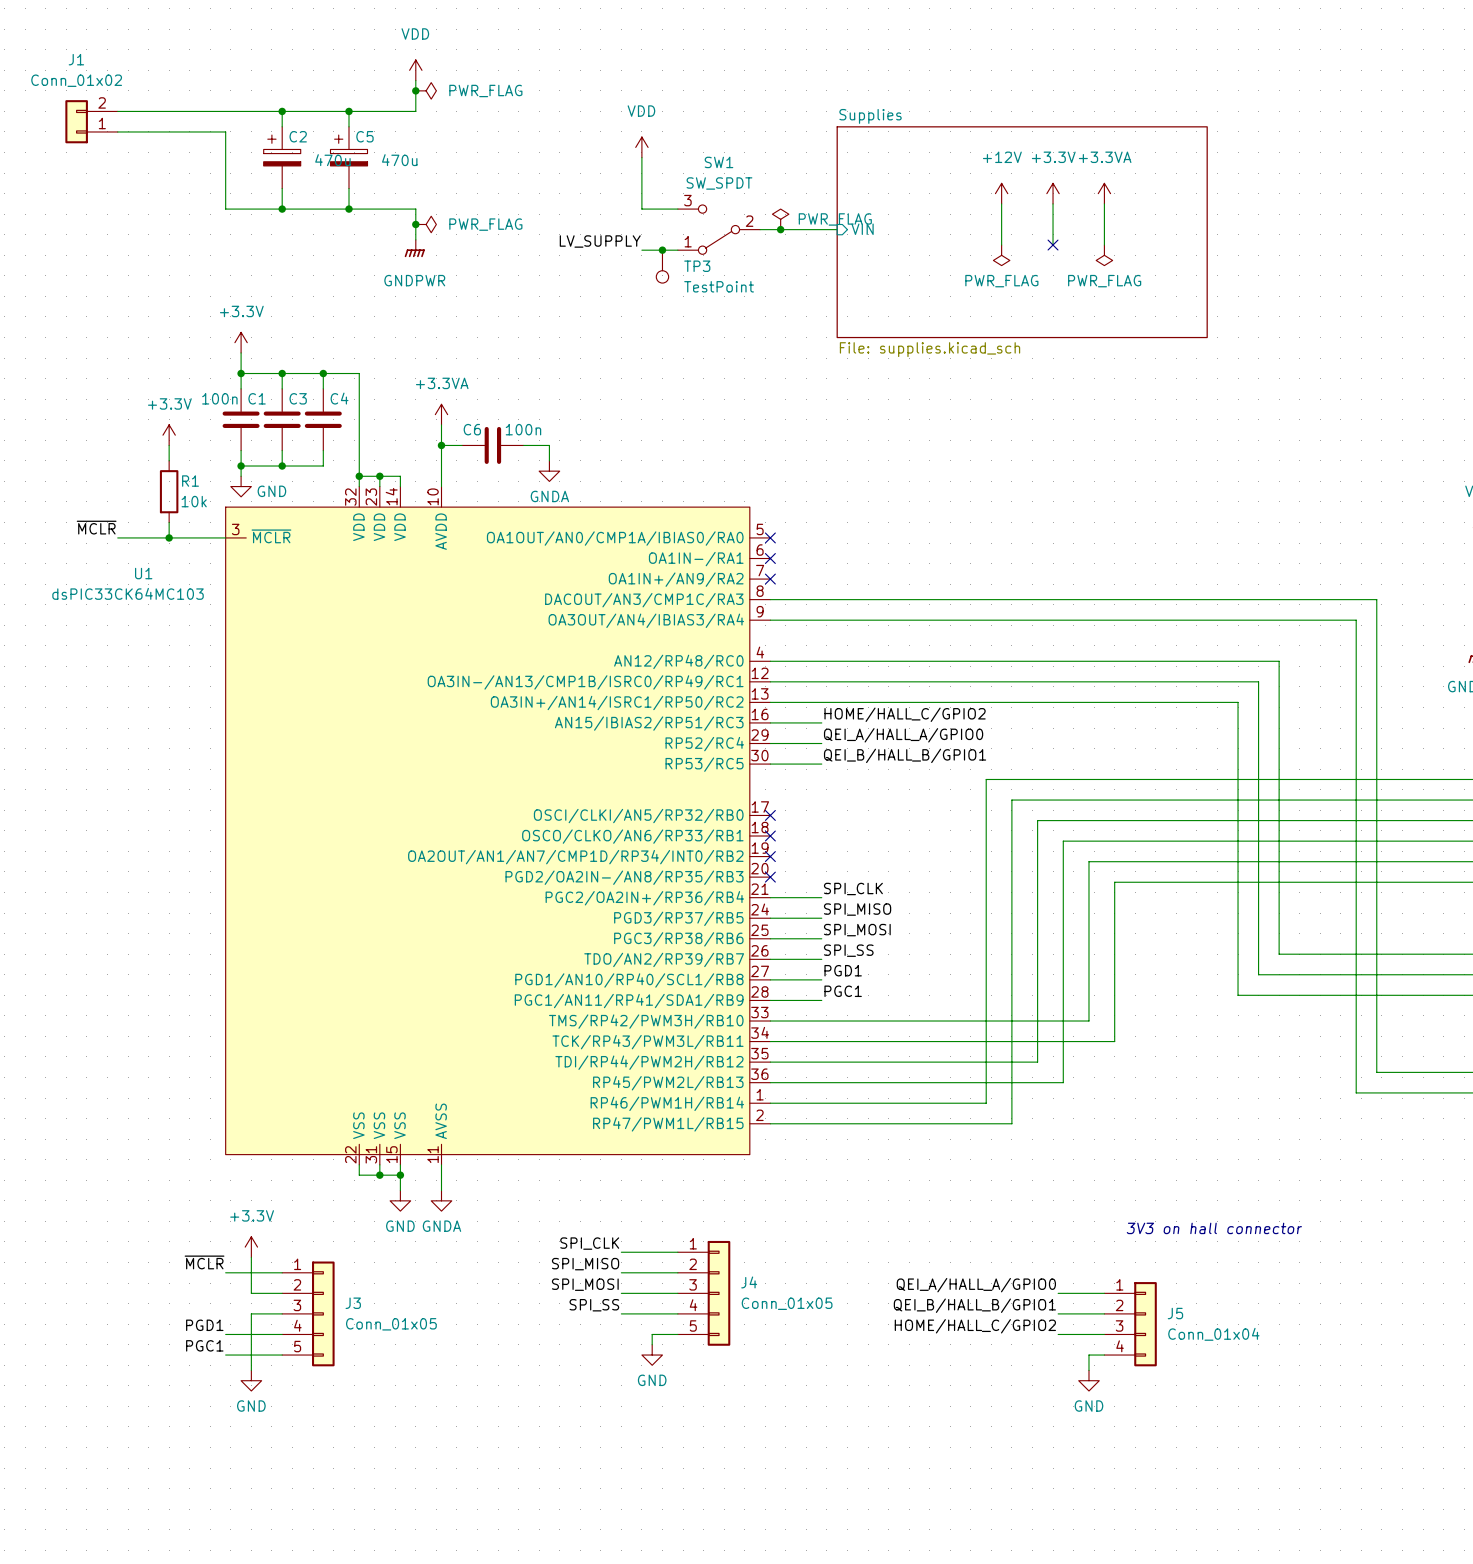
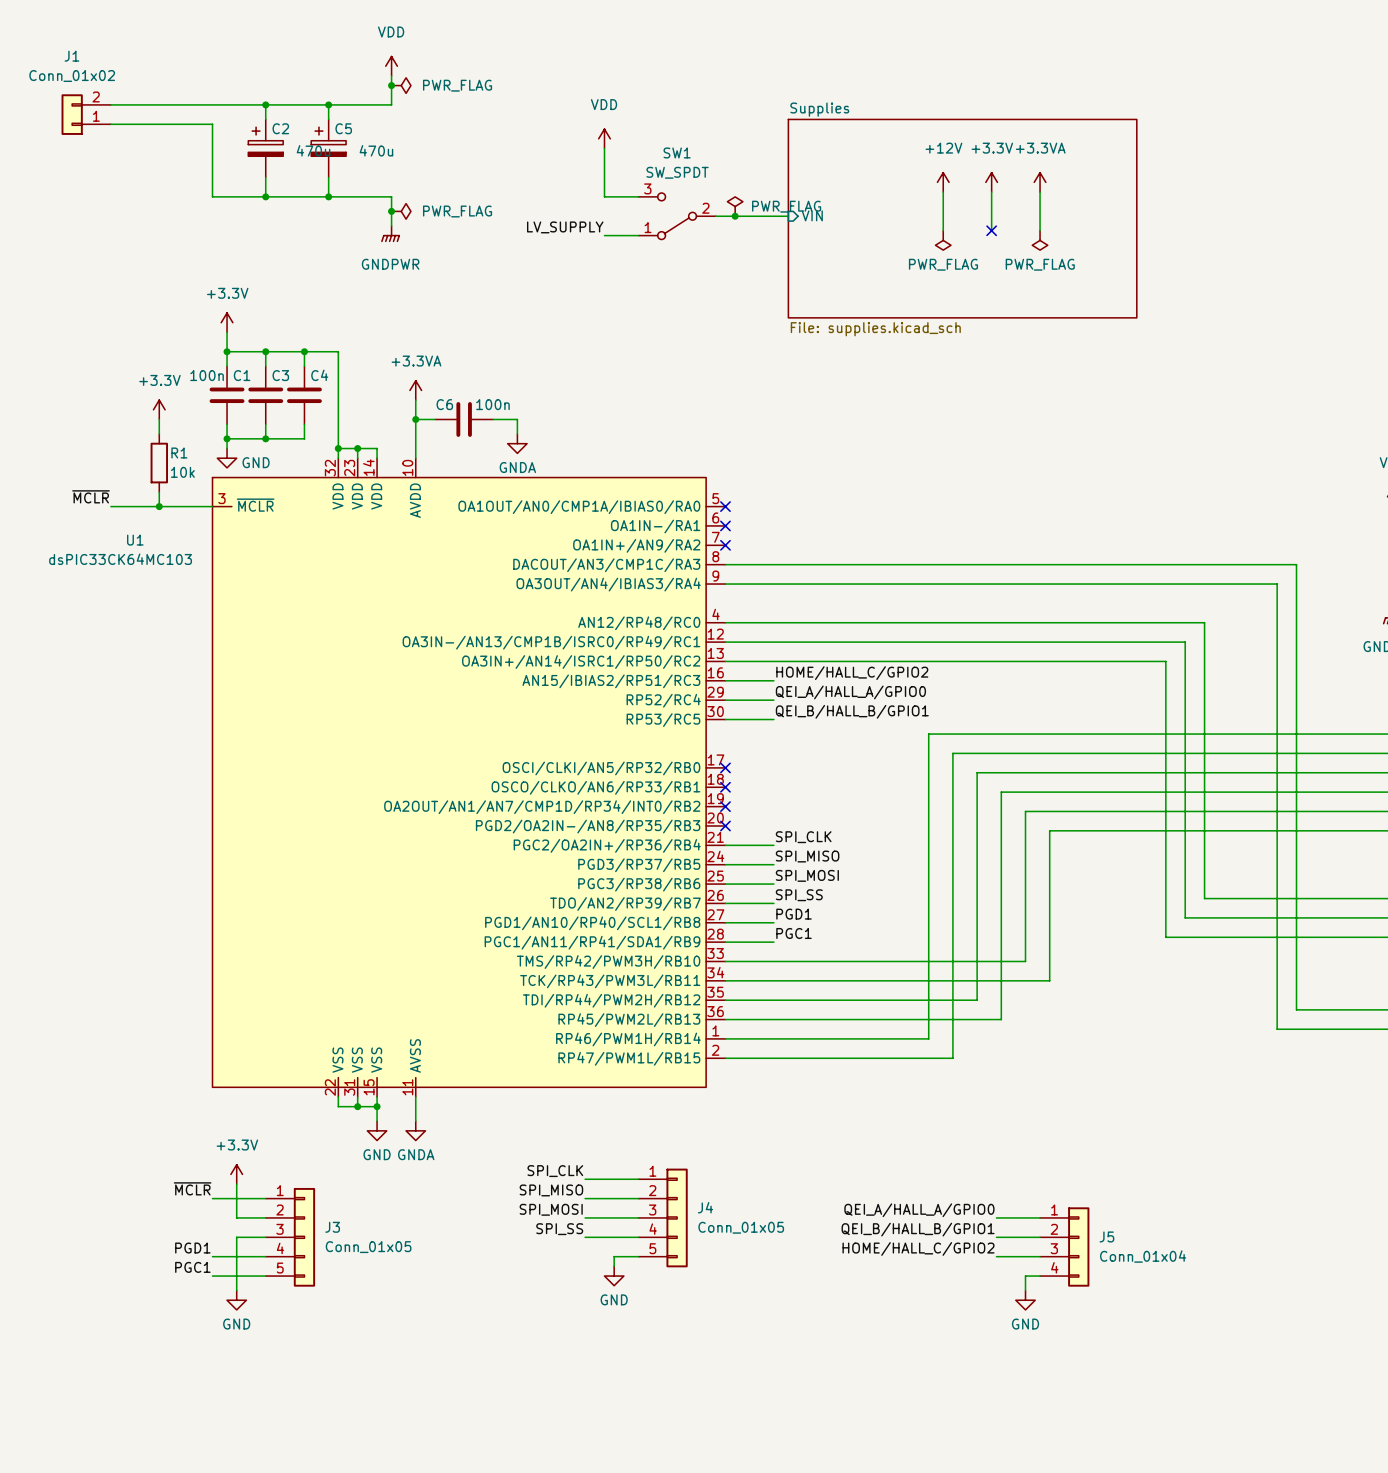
junction: (662, 250) -> none
TP3: TestPoint (662, 266) -> none
text: 3V3 on hall connector (1214, 1228) -> none

